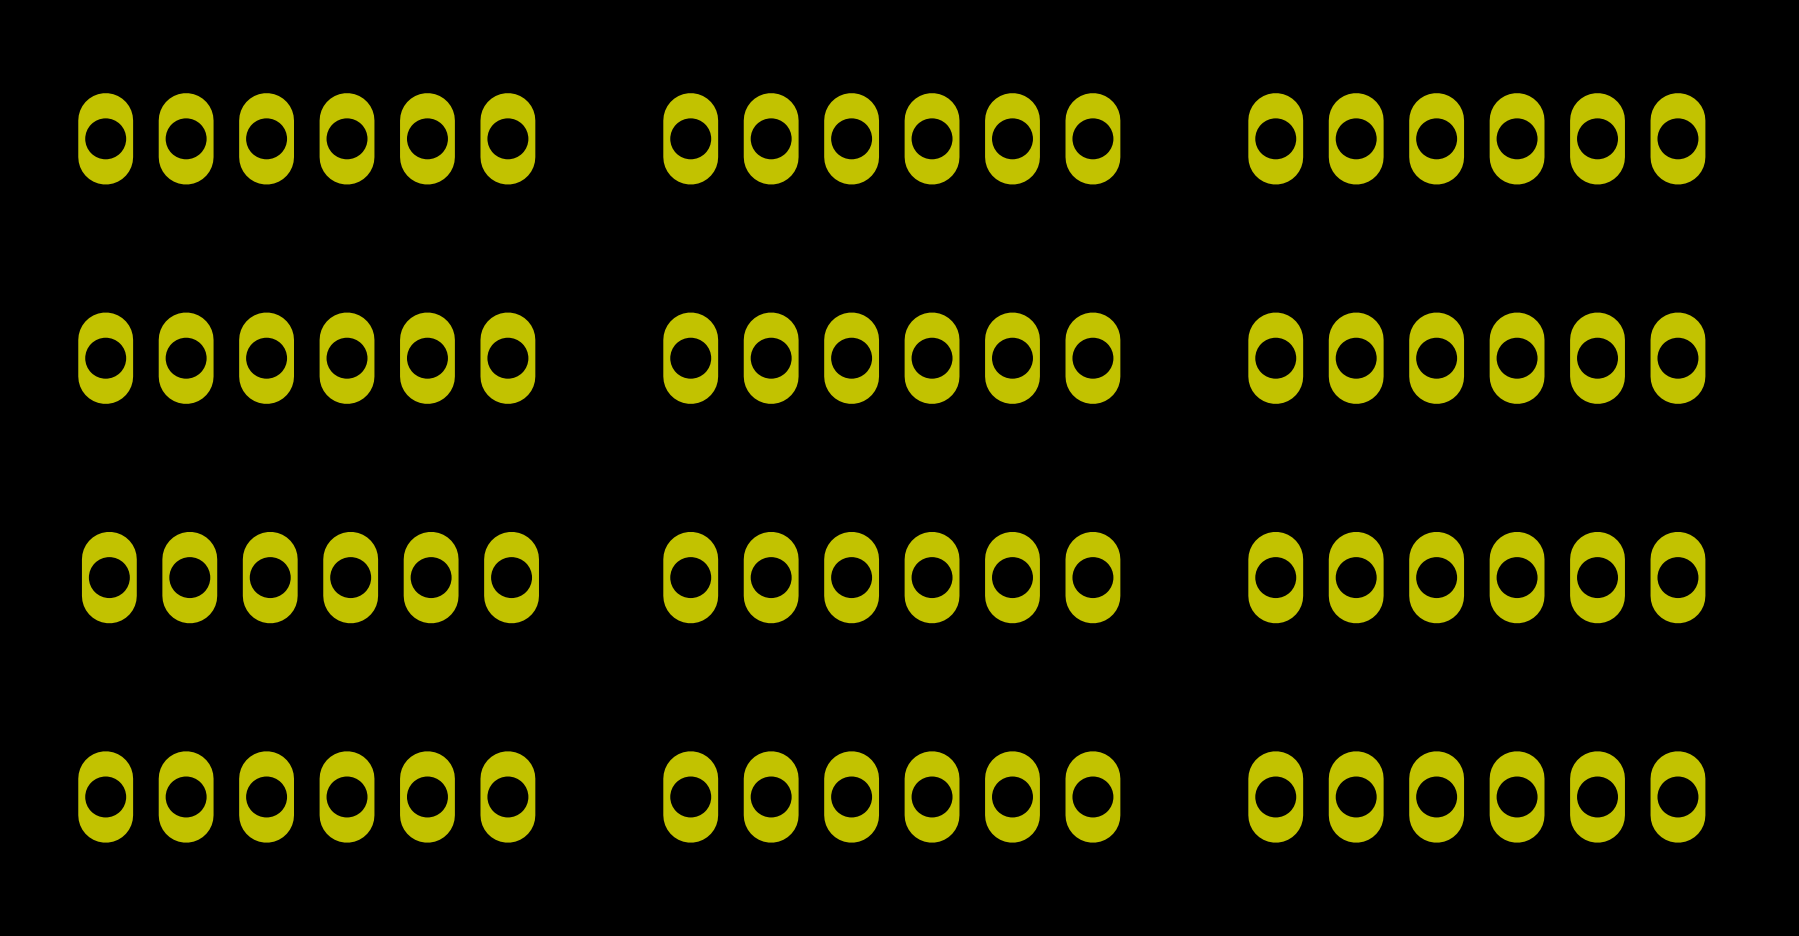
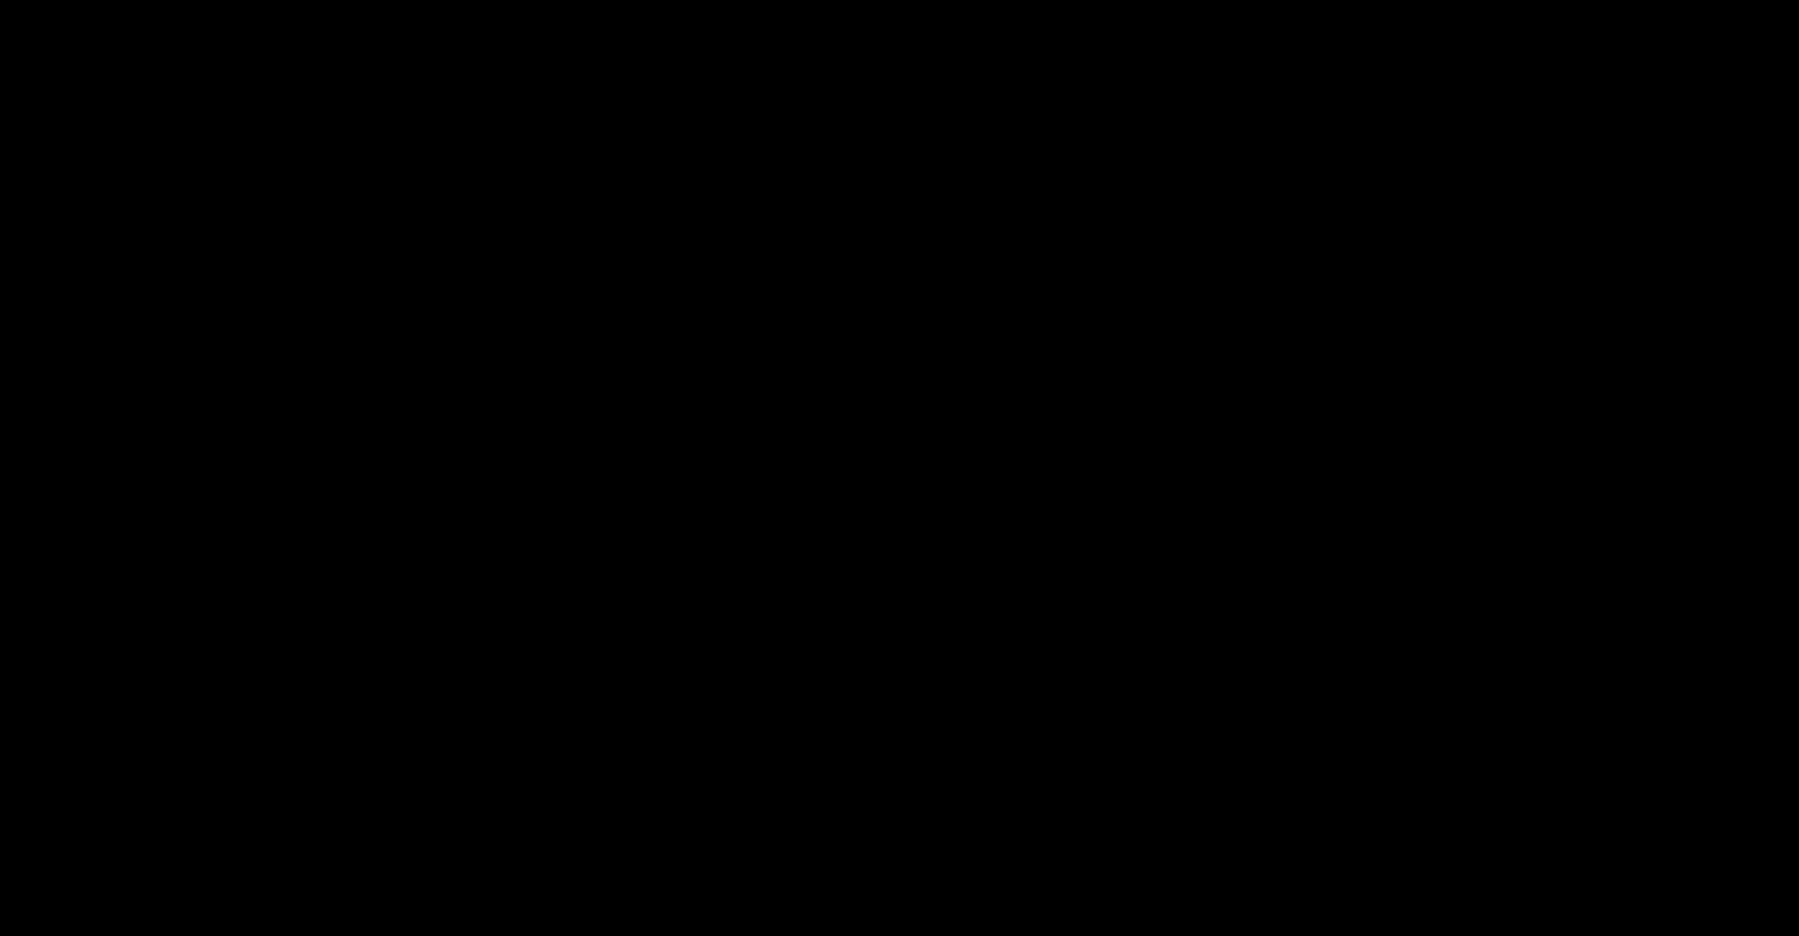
part: (306, 138) -> none
part: (891, 138) -> none
part: (1476, 138) -> none
part: (306, 358) -> none
part: (891, 358) -> none
part: (1476, 358) -> none
part: (310, 577) -> none
part: (891, 577) -> none
part: (1476, 577) -> none
part: (306, 796) -> none
part: (891, 796) -> none
part: (1476, 796) -> none

